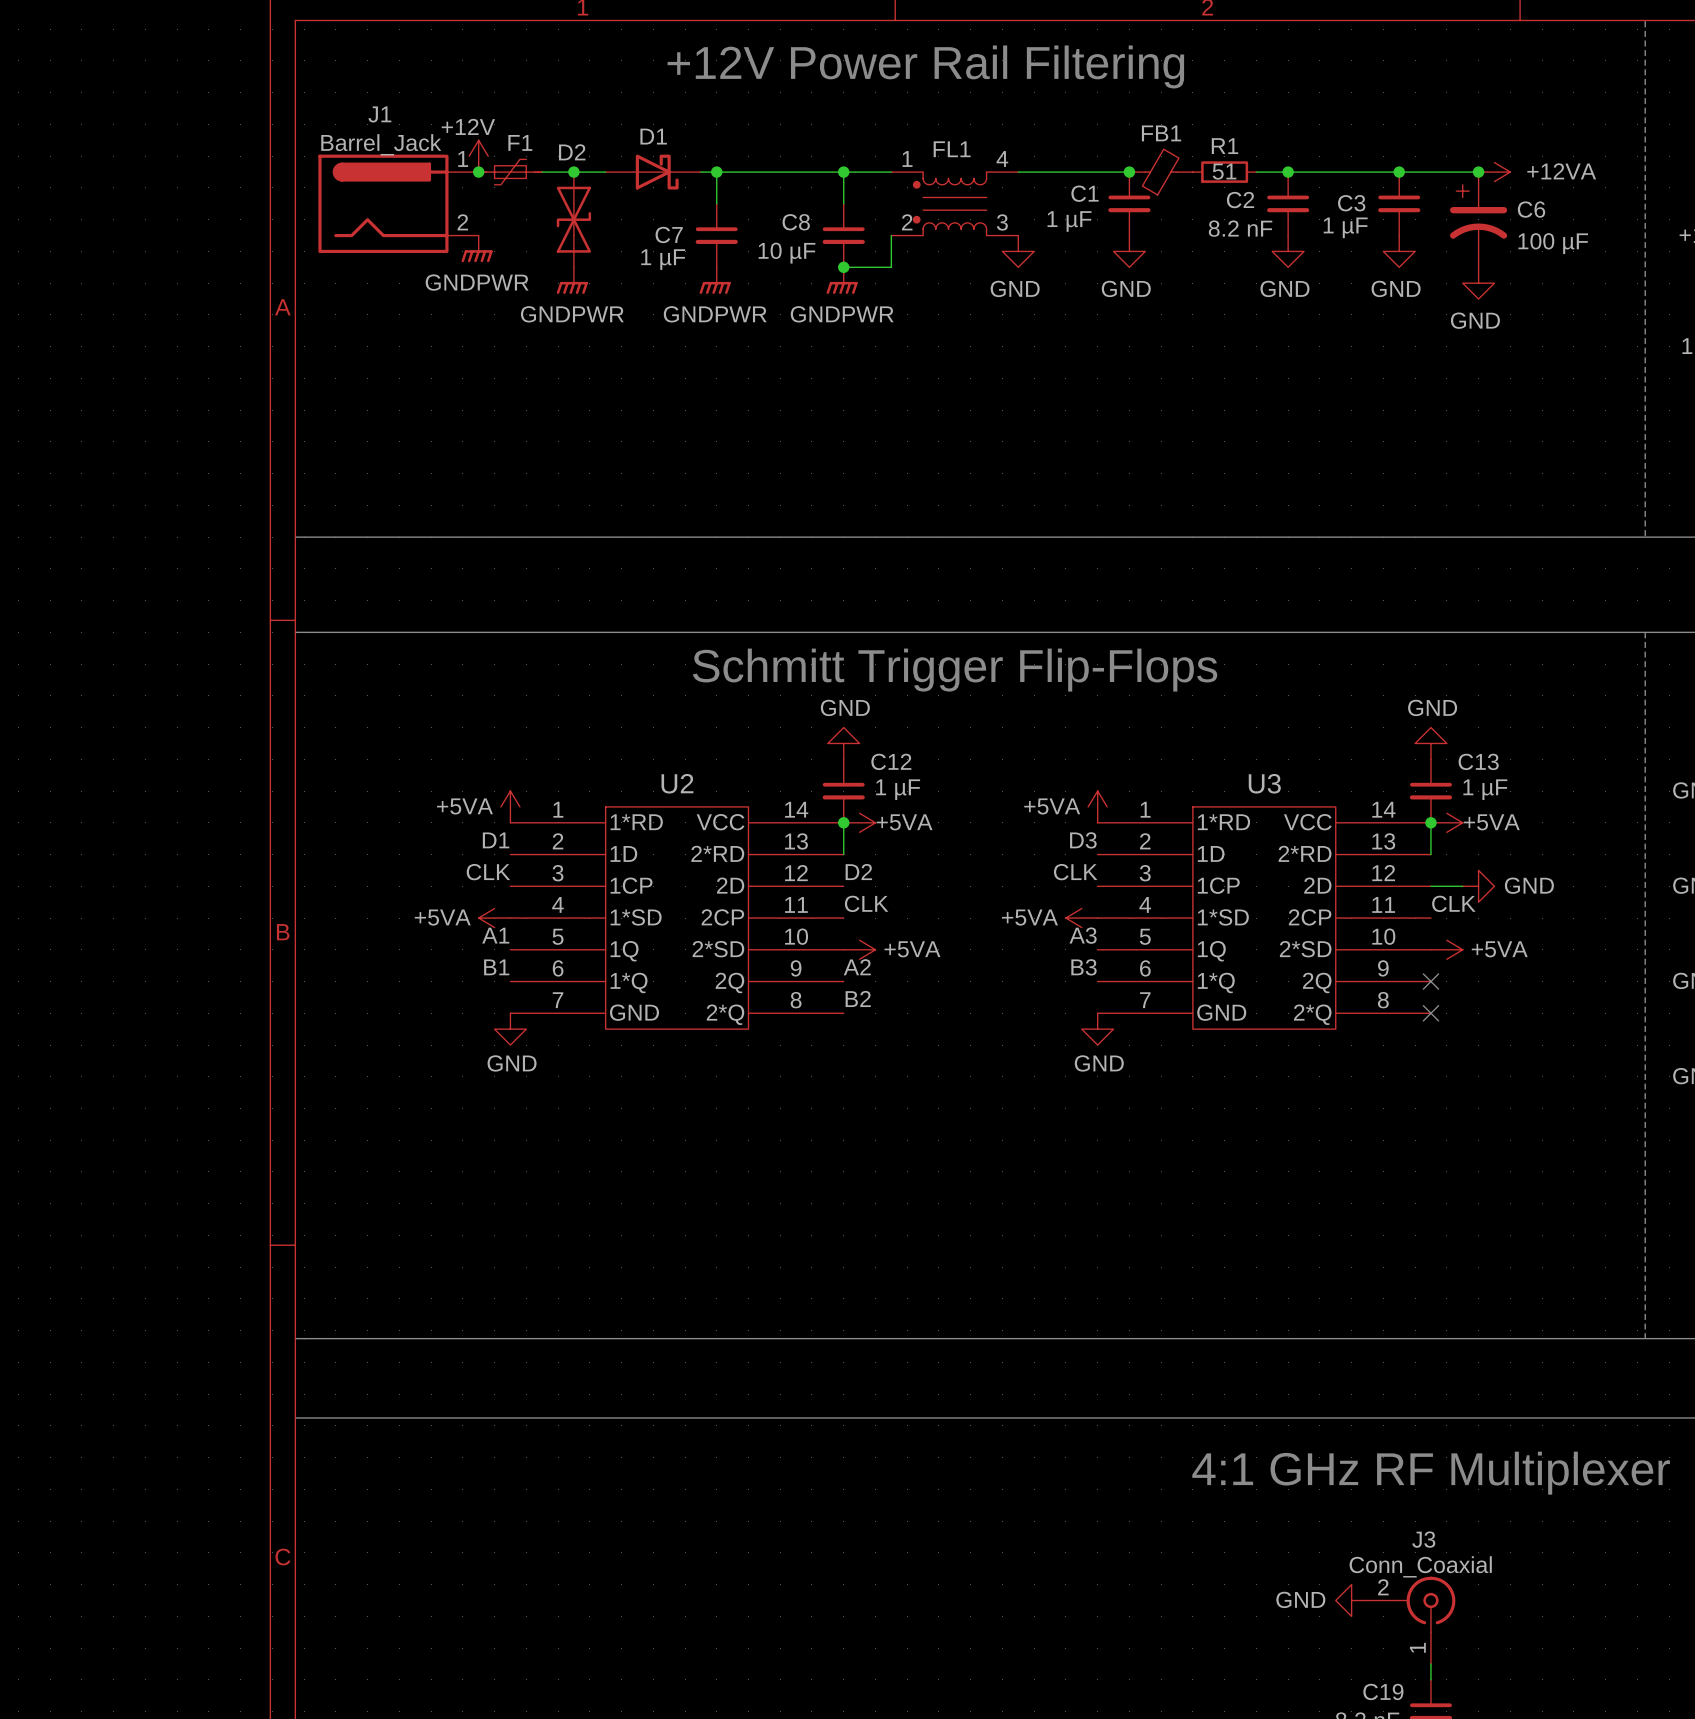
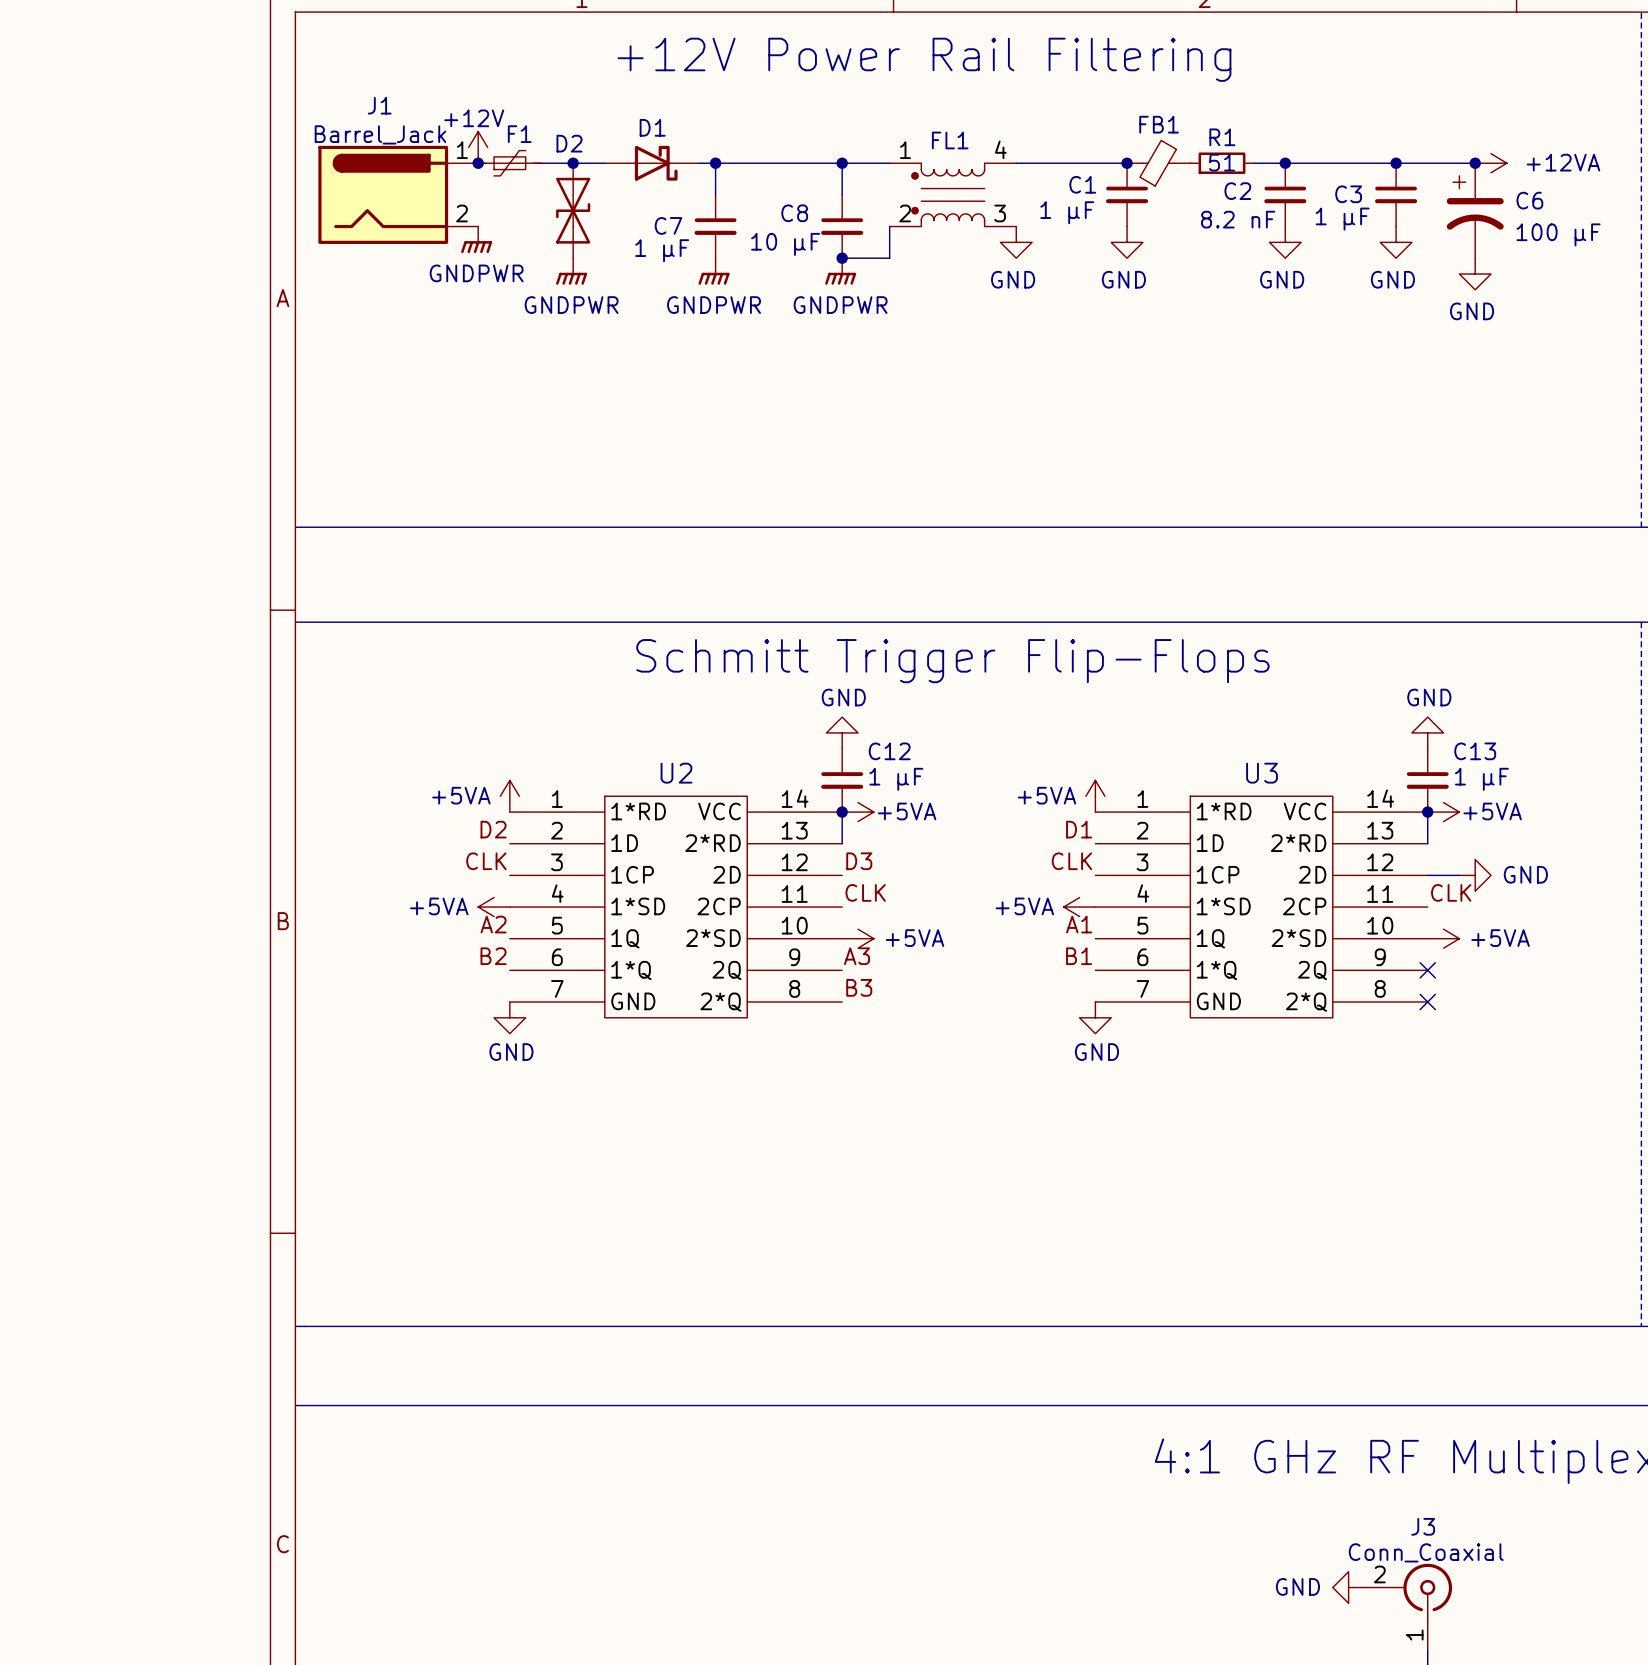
label: D1 (496, 840) -> D2 (493, 829)
label: D3 (1083, 840) -> D1 (1079, 829)
label: D2 (858, 872) -> D3 (859, 861)
label: A1 (495, 935) -> A2 (493, 924)
label: A3 (1083, 935) -> A1 (1079, 924)
label: B1 (496, 967) -> B2 (493, 956)
label: A2 (857, 967) -> A3 (857, 956)
label: B3 (1084, 967) -> B1 (1079, 956)
label: B2 (858, 998) -> B3 (859, 987)

